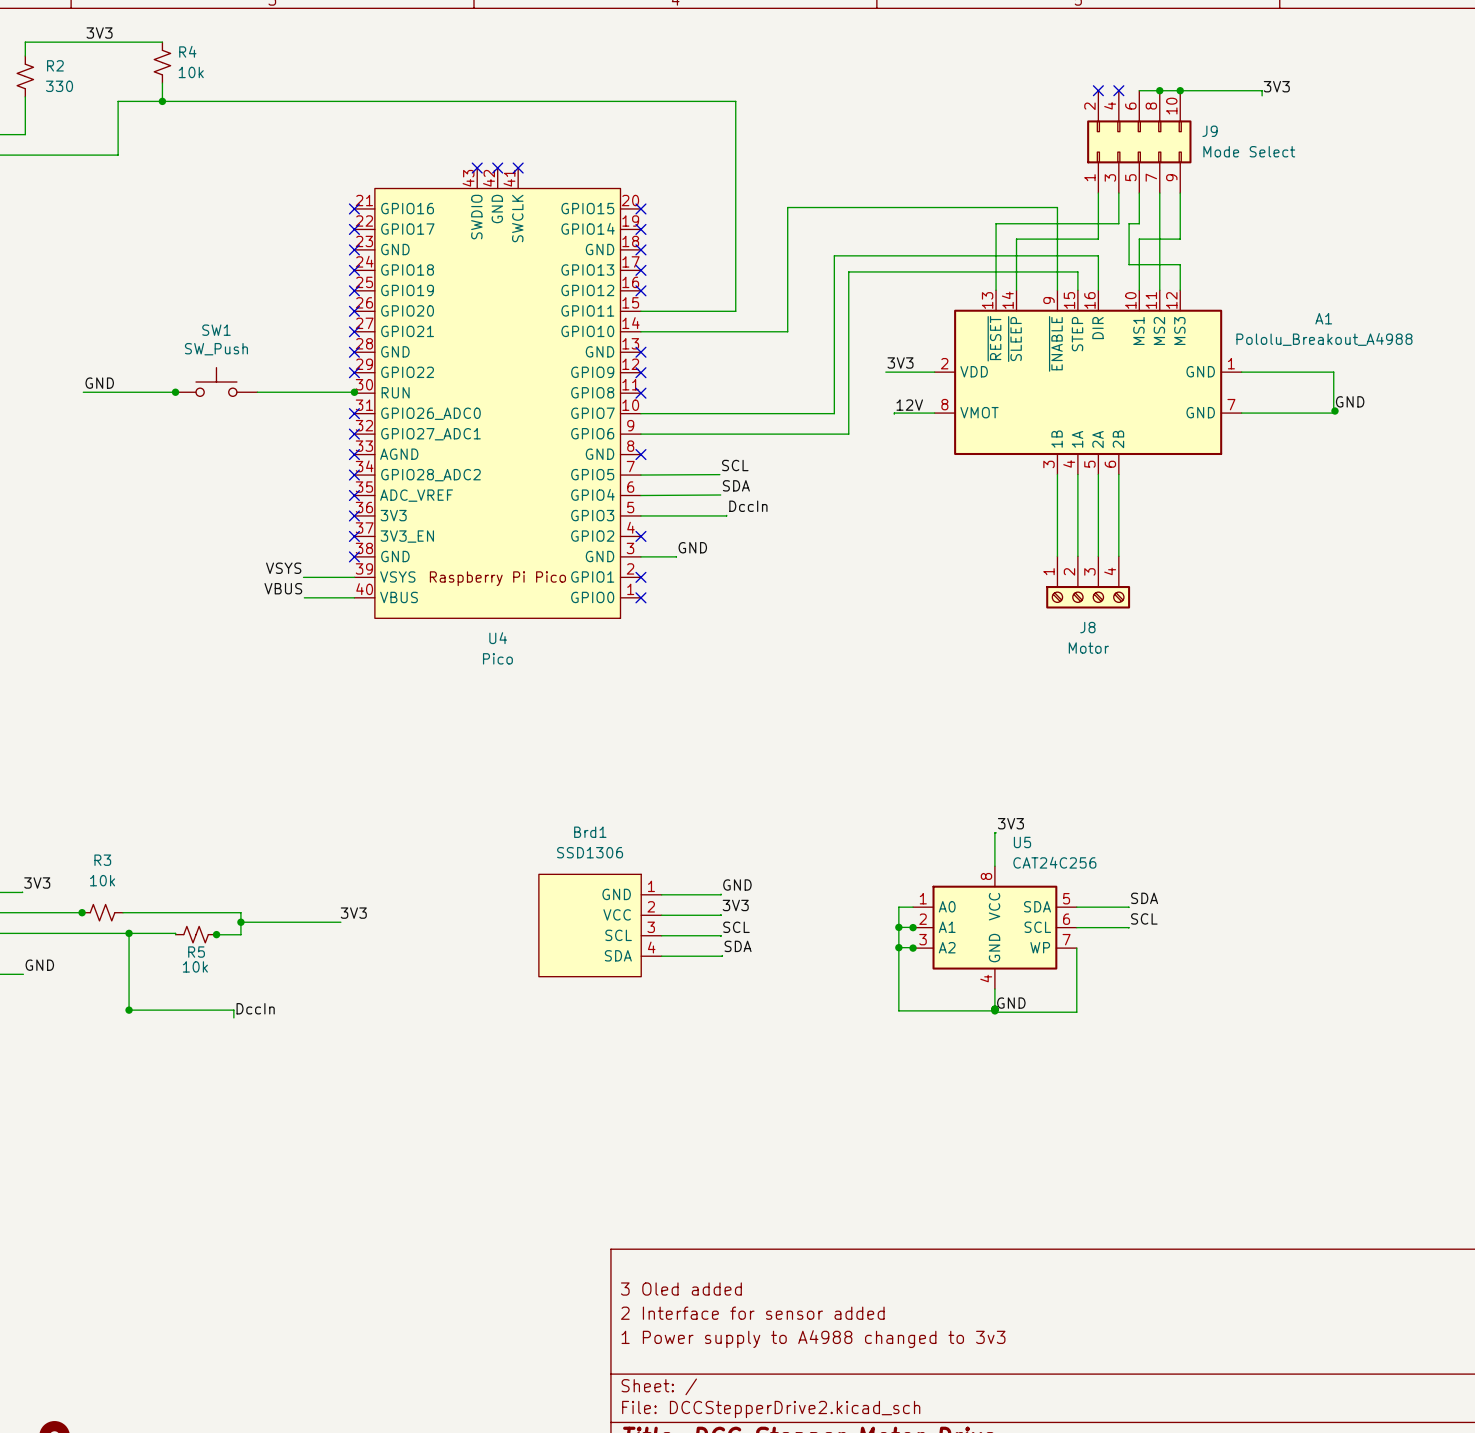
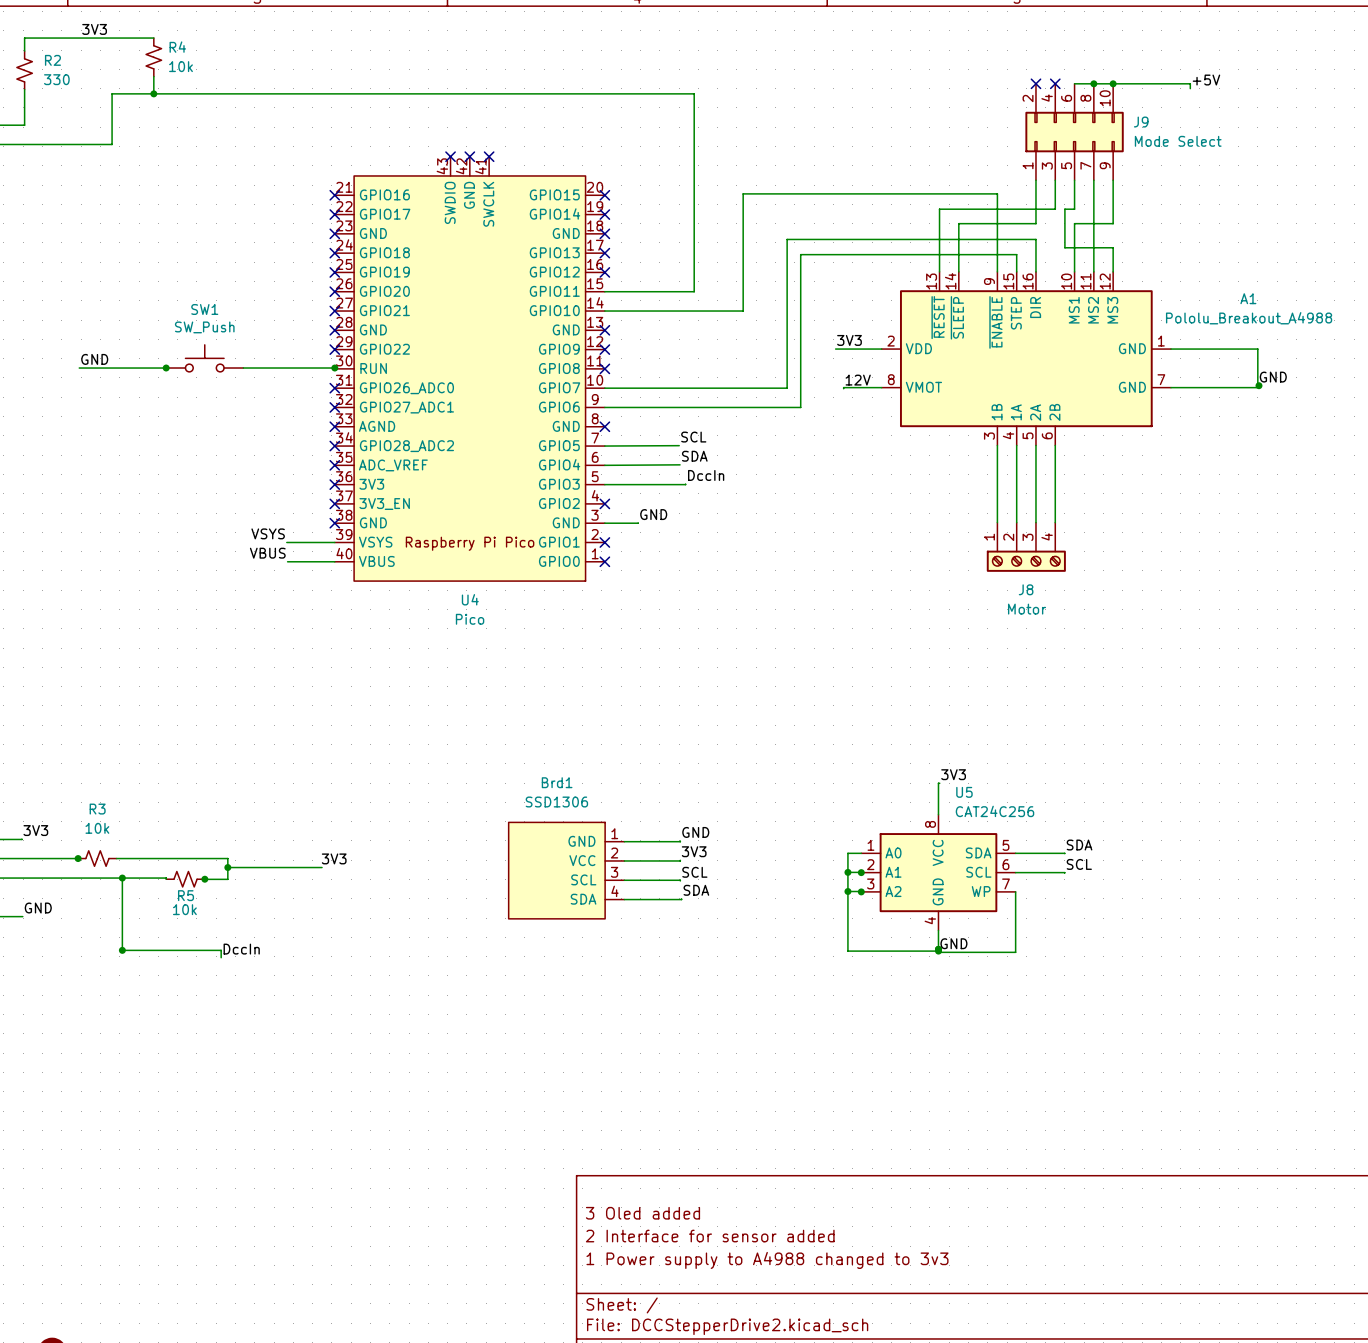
label: 3V3 (1276, 86) -> +5V (1206, 80)

